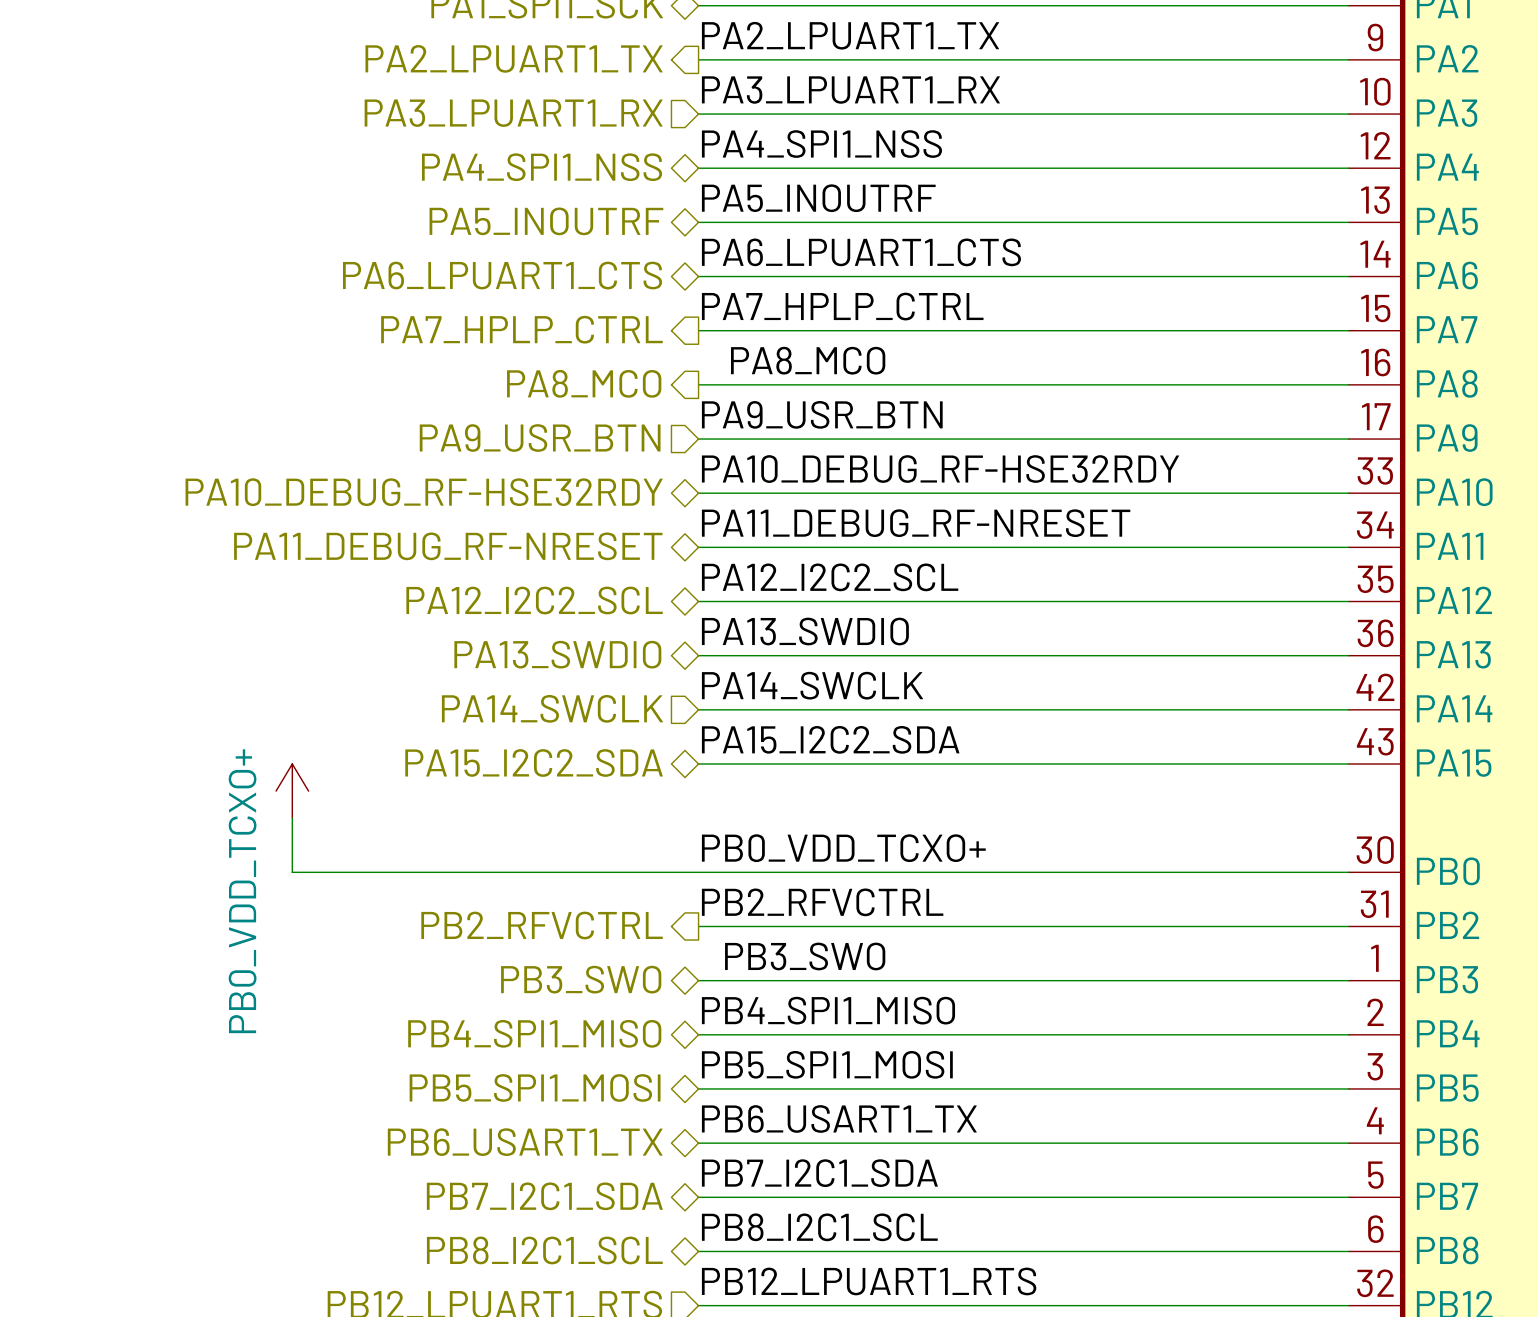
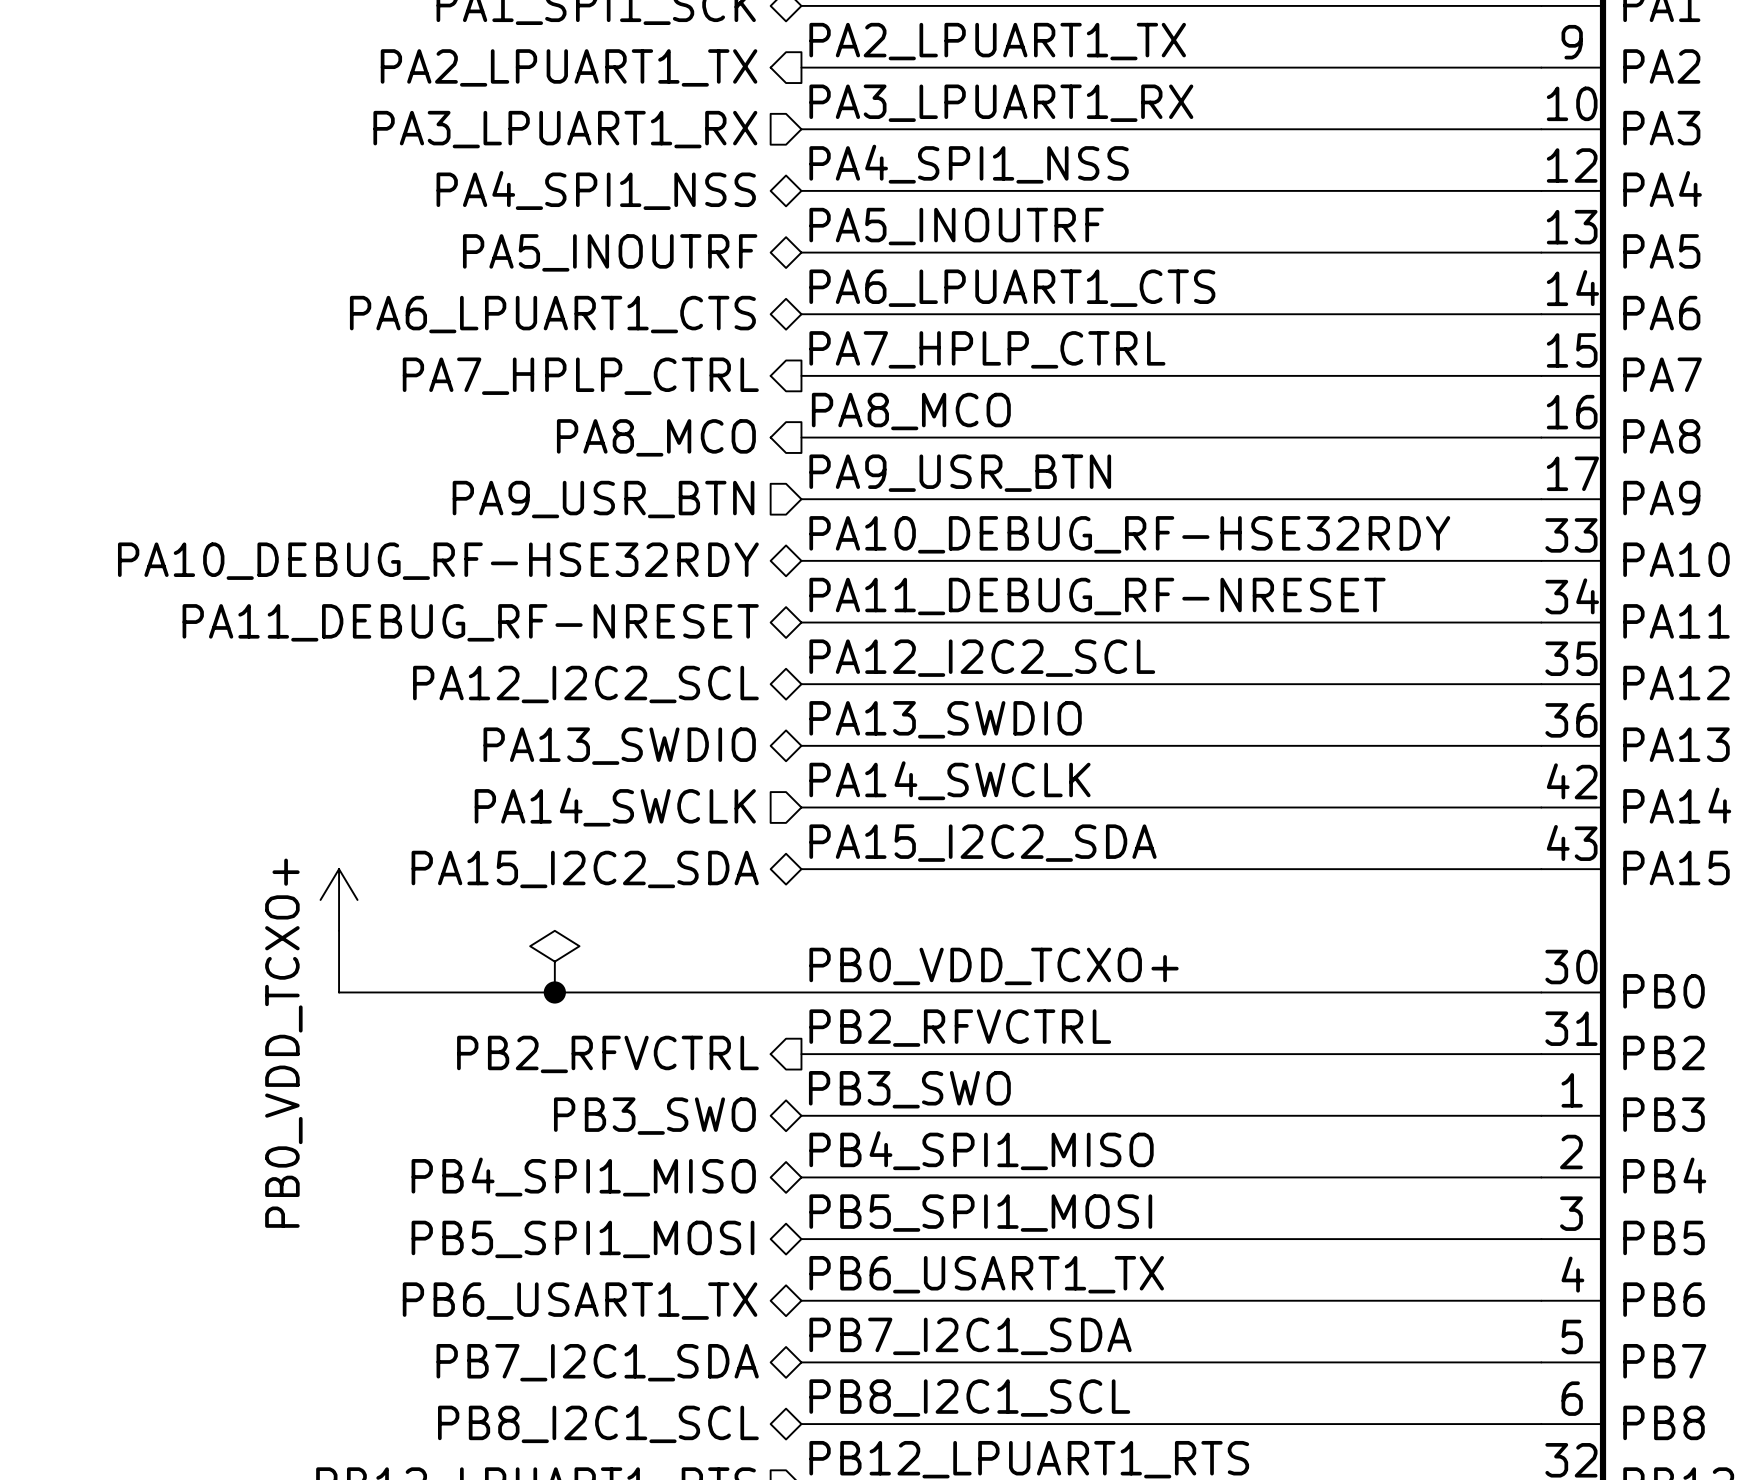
power symbol: none -> (554, 961)
junction: none -> (554, 992)

